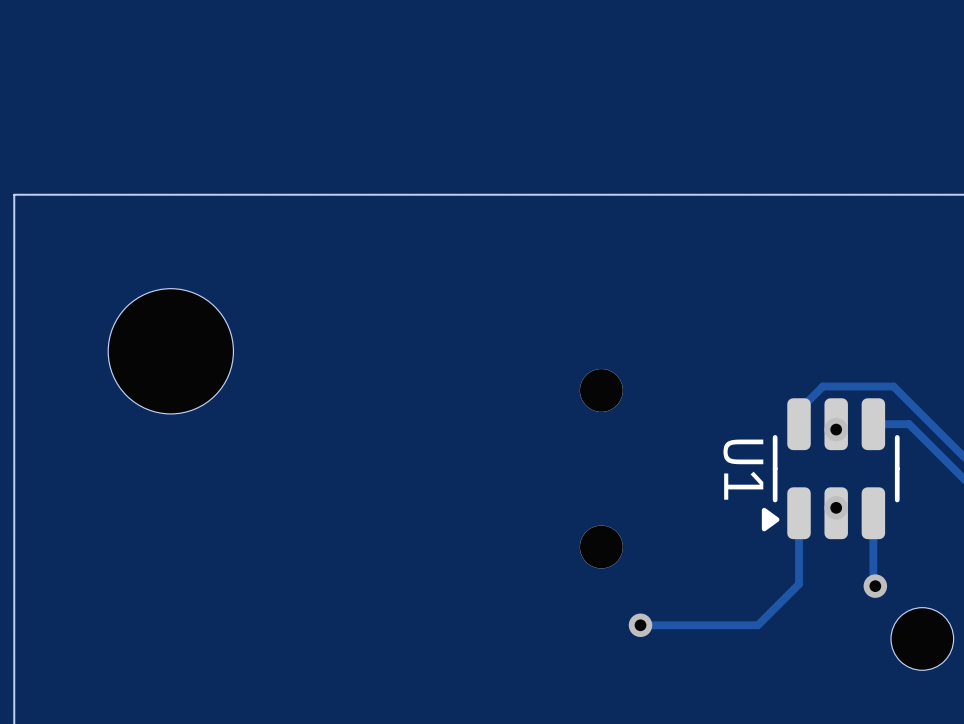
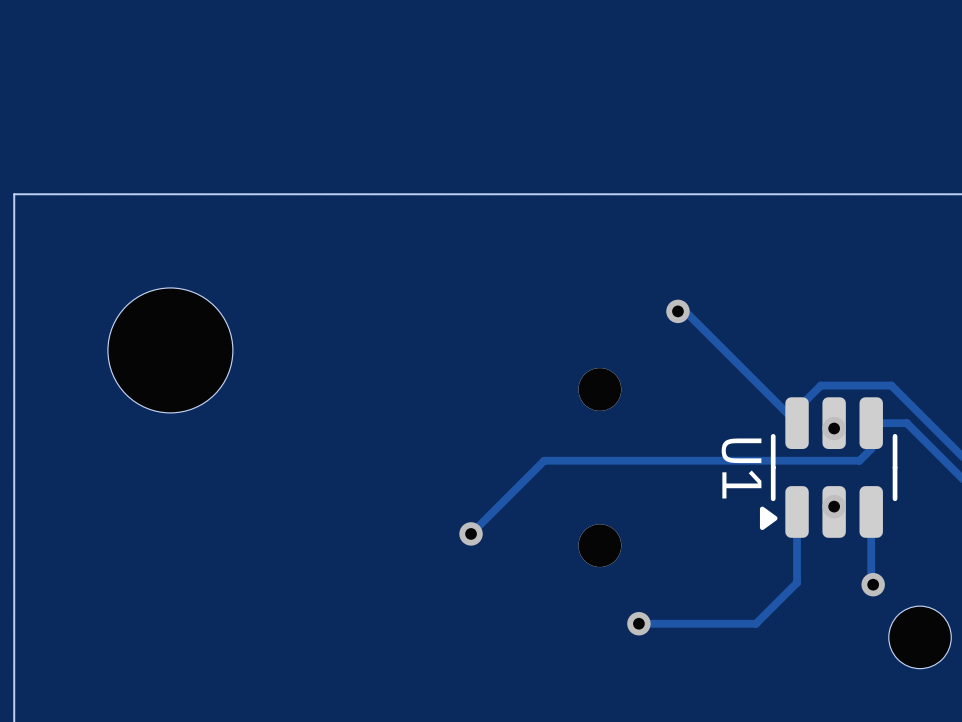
track: none -> (677, 311) (685, 311) (797, 423)
via: none -> (677, 311)
track: none -> (871, 423) (871, 449) (859, 460) (544, 460) (471, 533)
via: none -> (471, 533)

